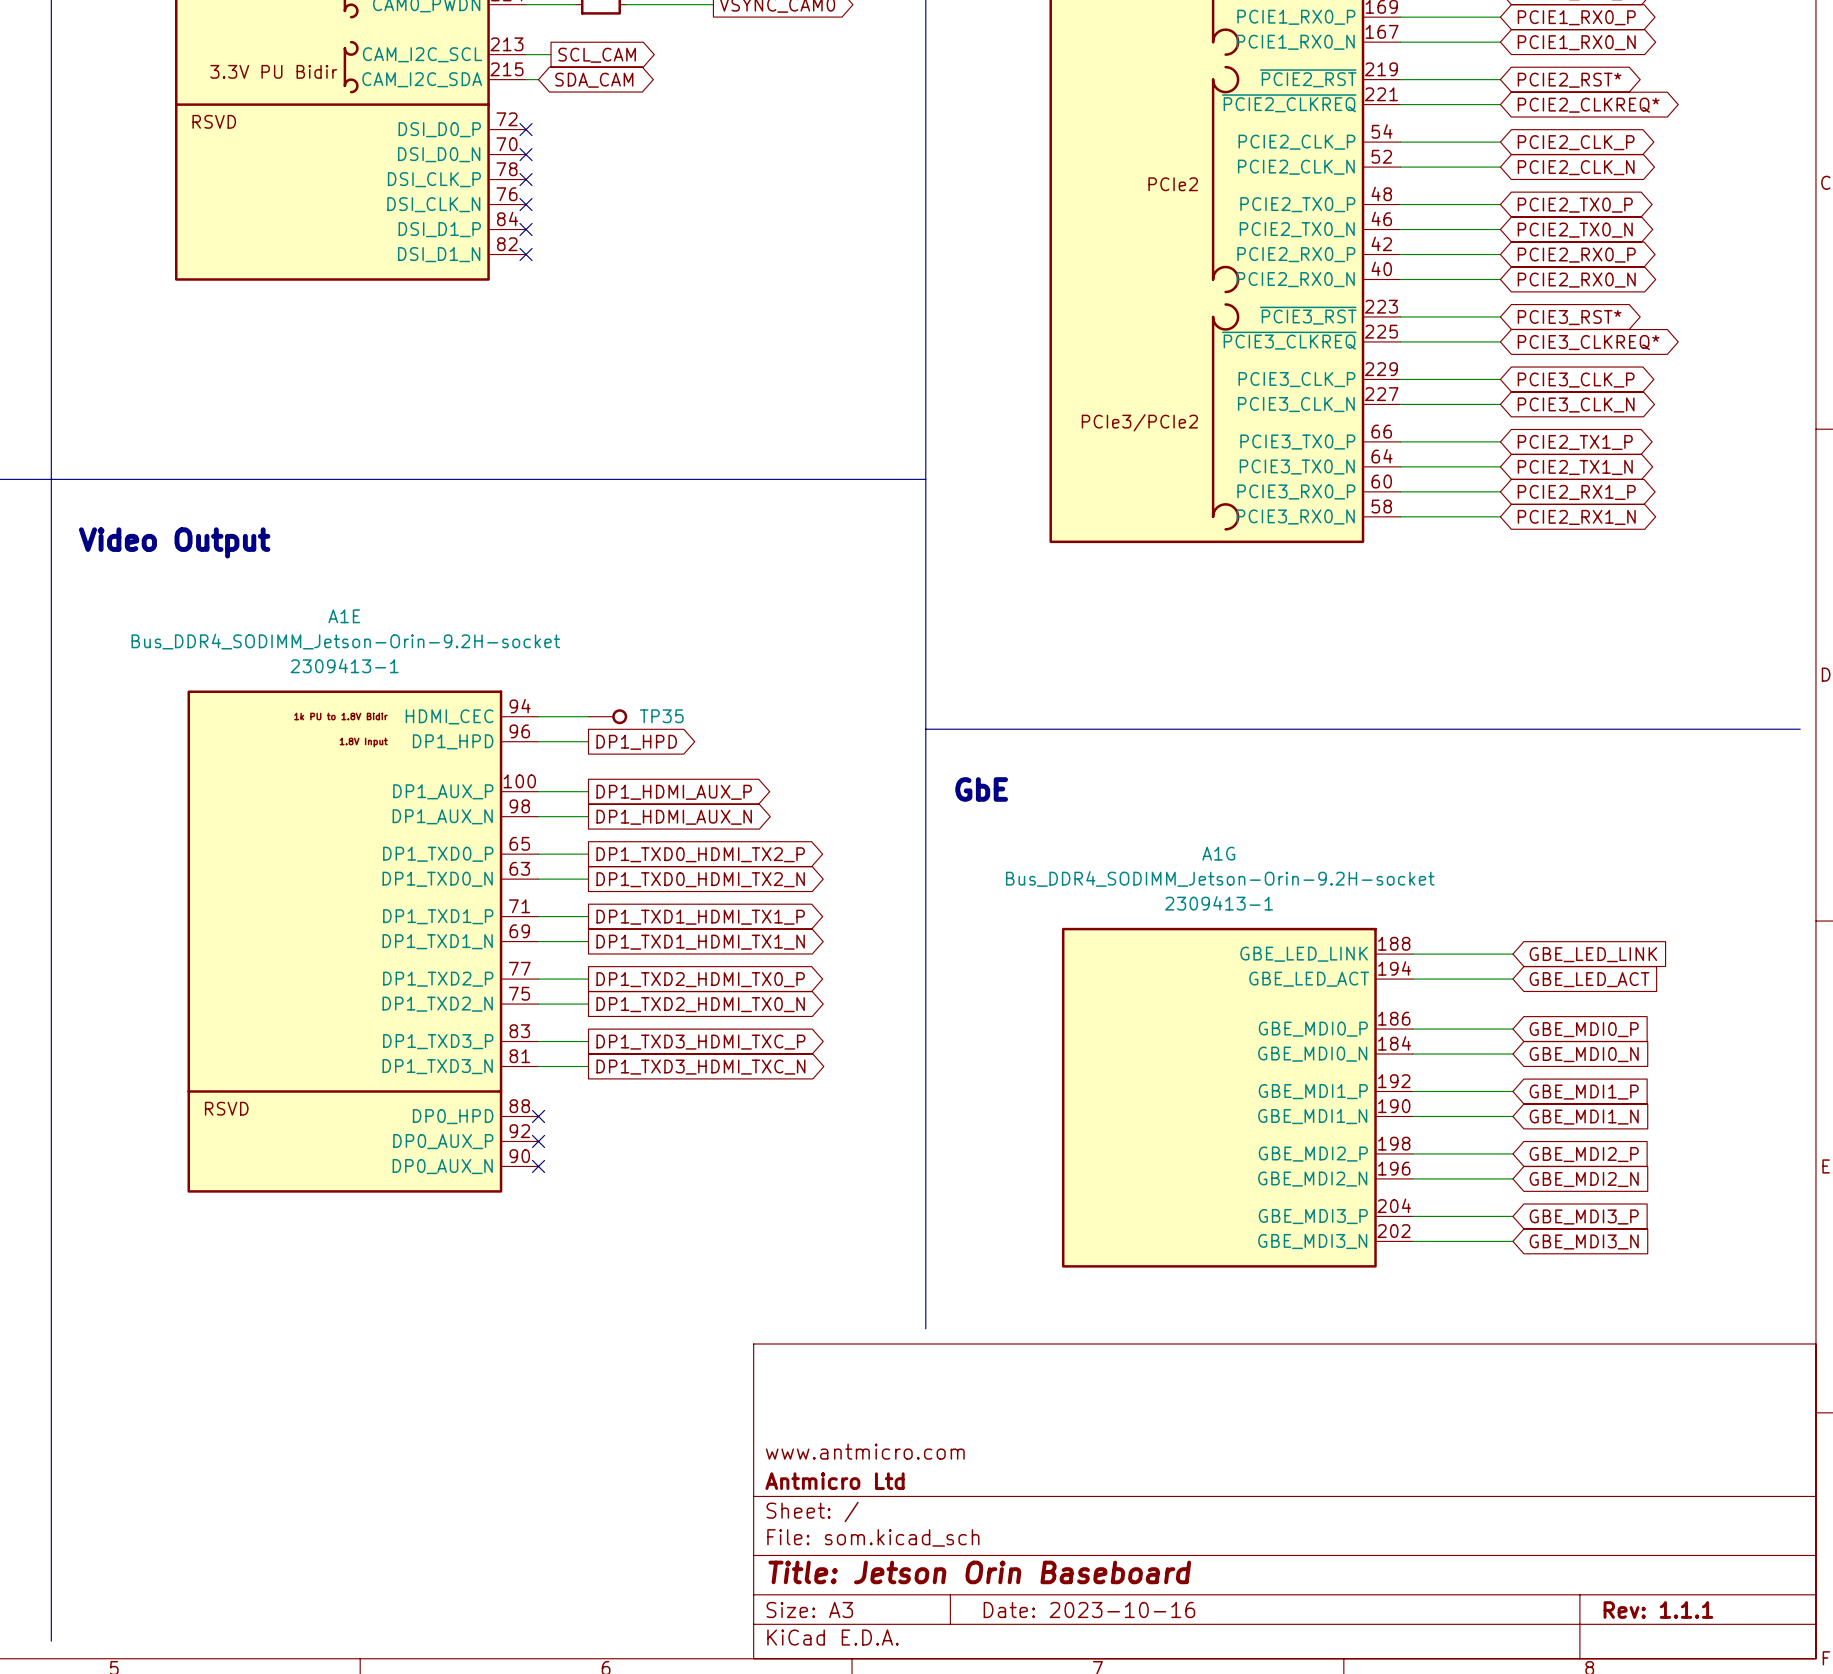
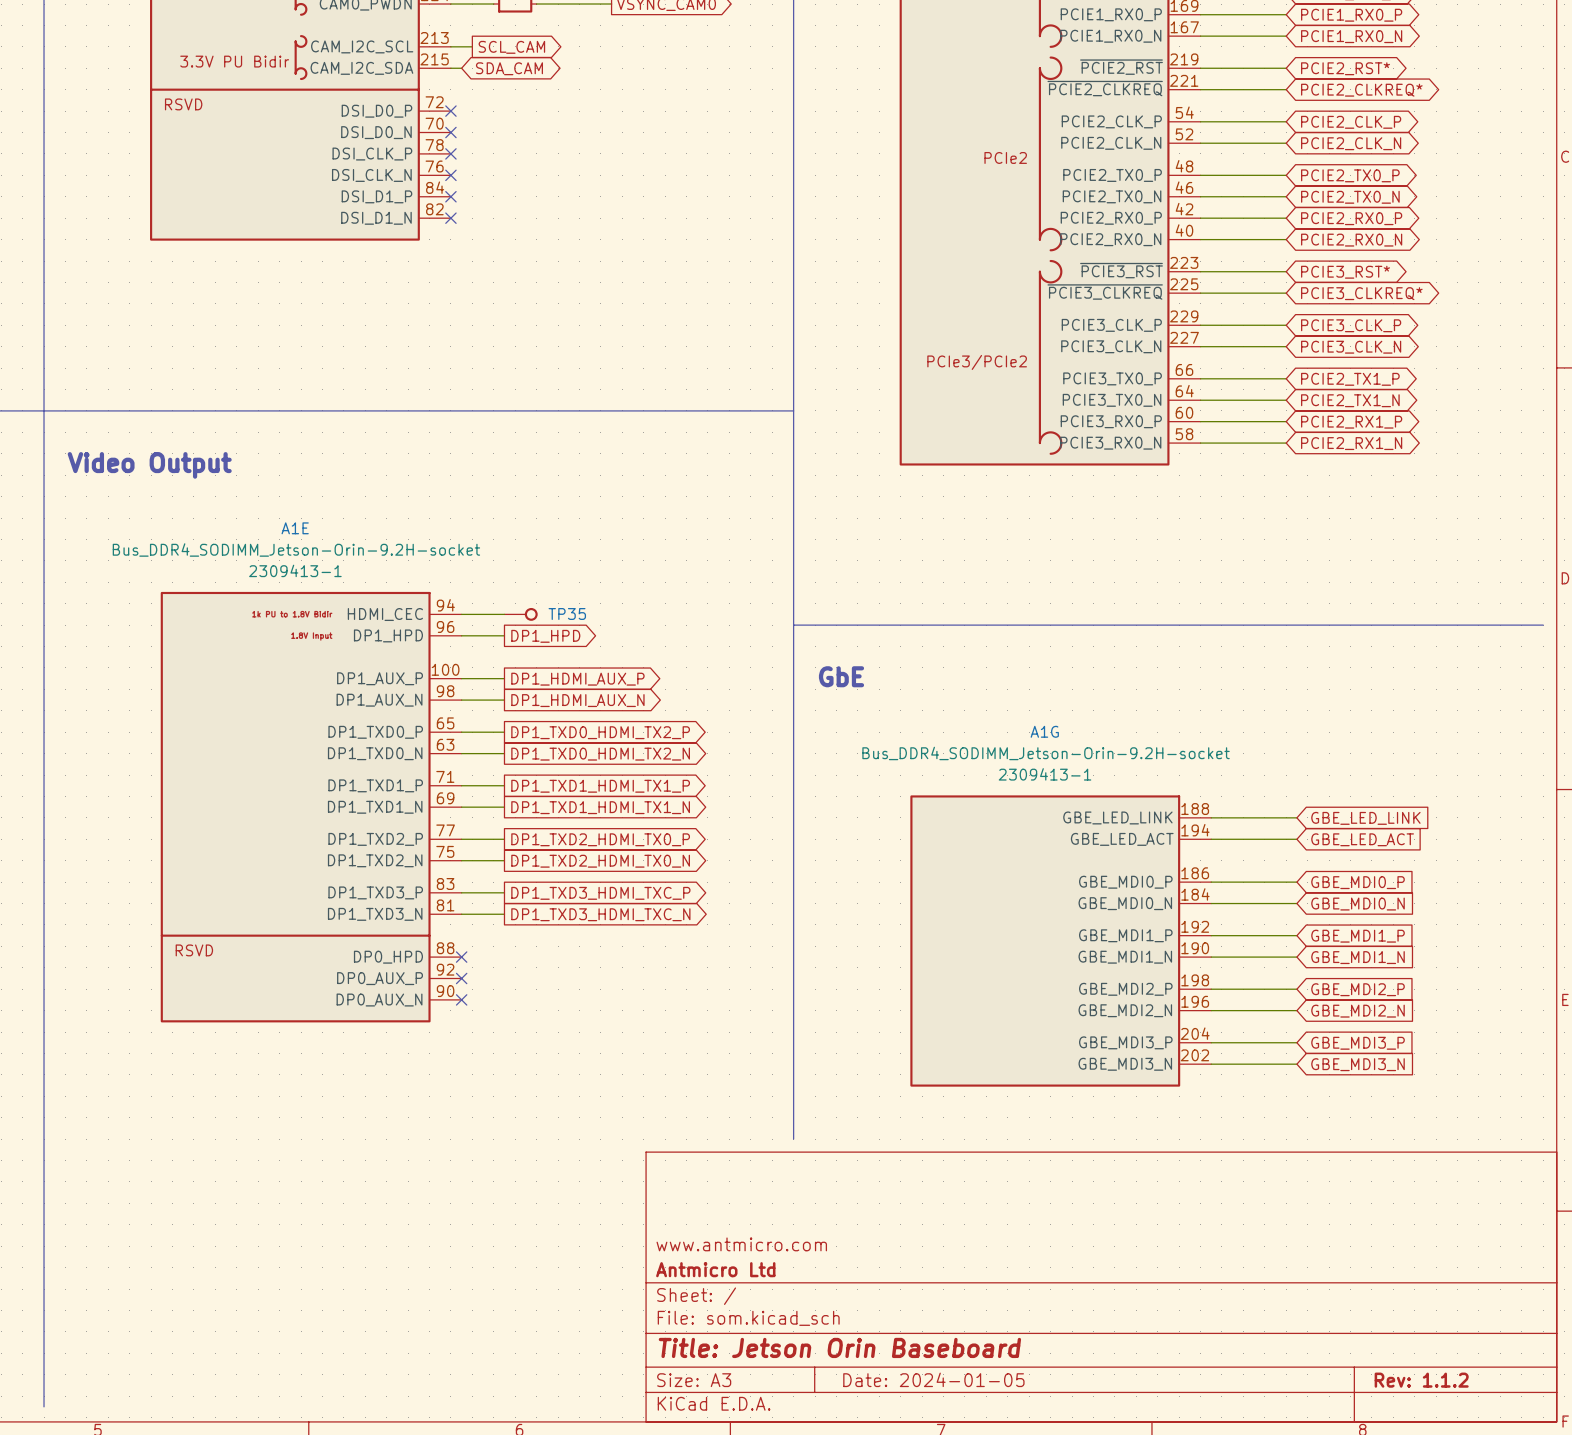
title block: Date: 2023-10-16 (1089, 1610) -> Date: 2024-01-05 (933, 1379)
title block: Rev: 1.1.1 (1658, 1610) -> Rev: 1.1.2 (1421, 1380)

